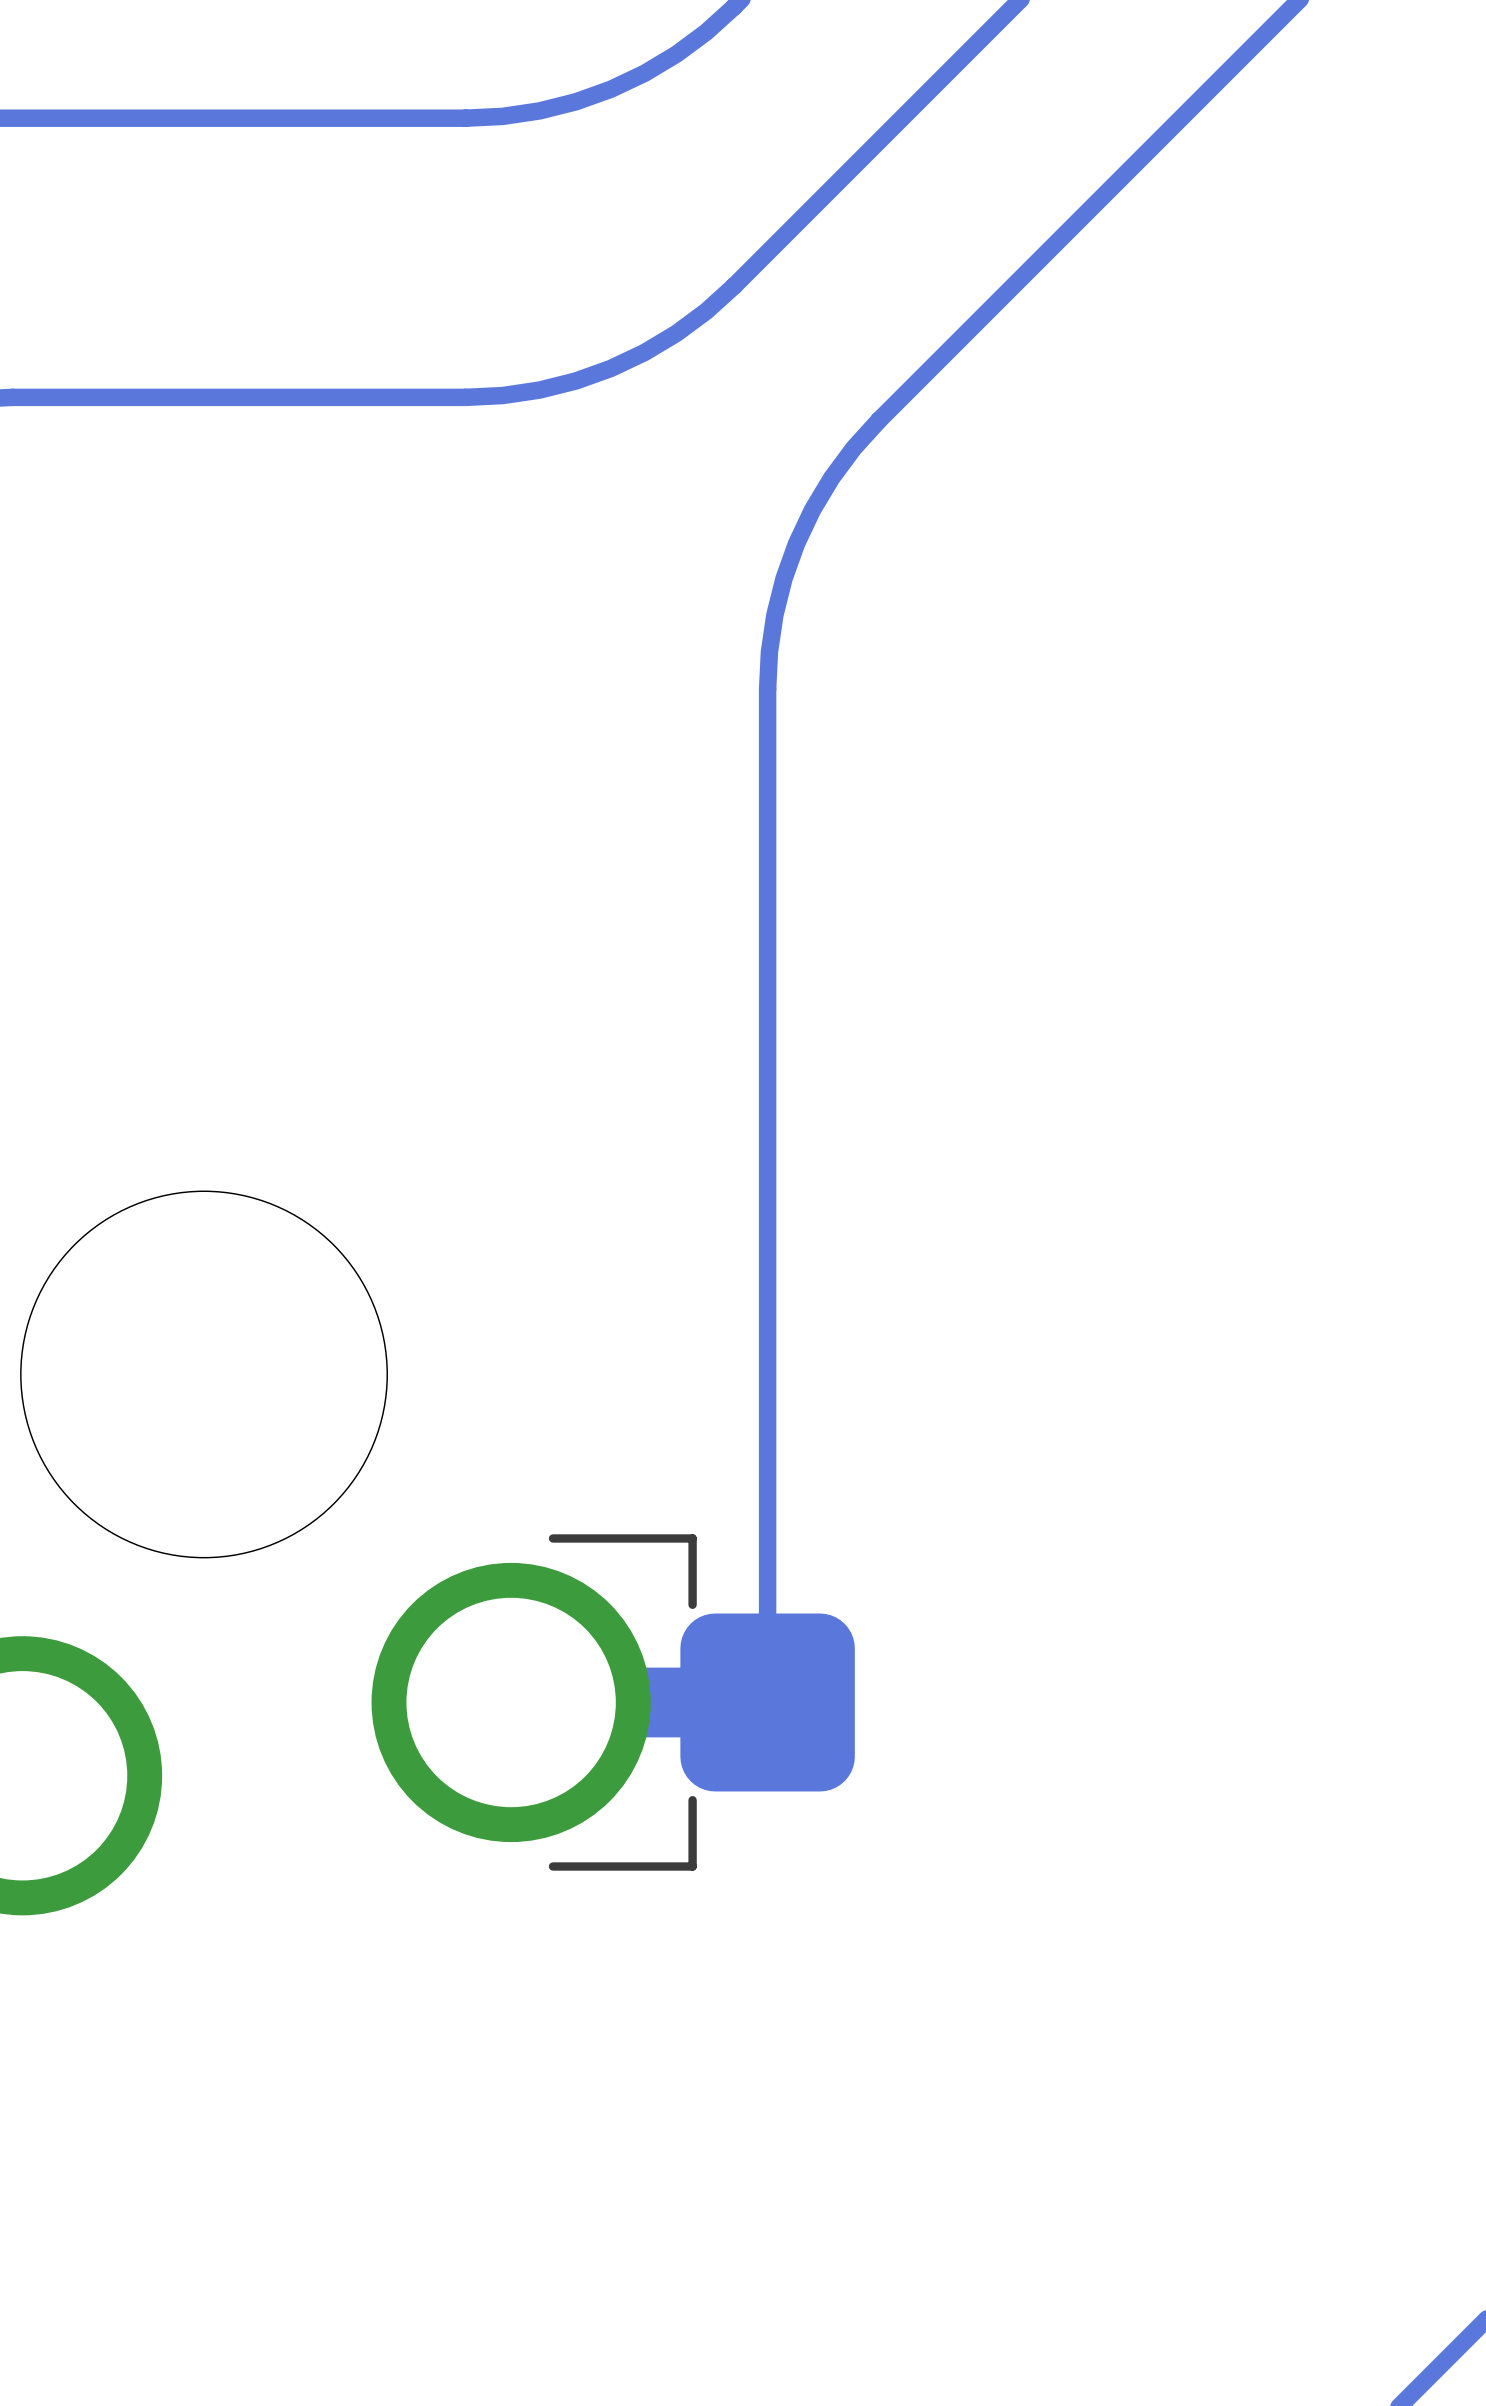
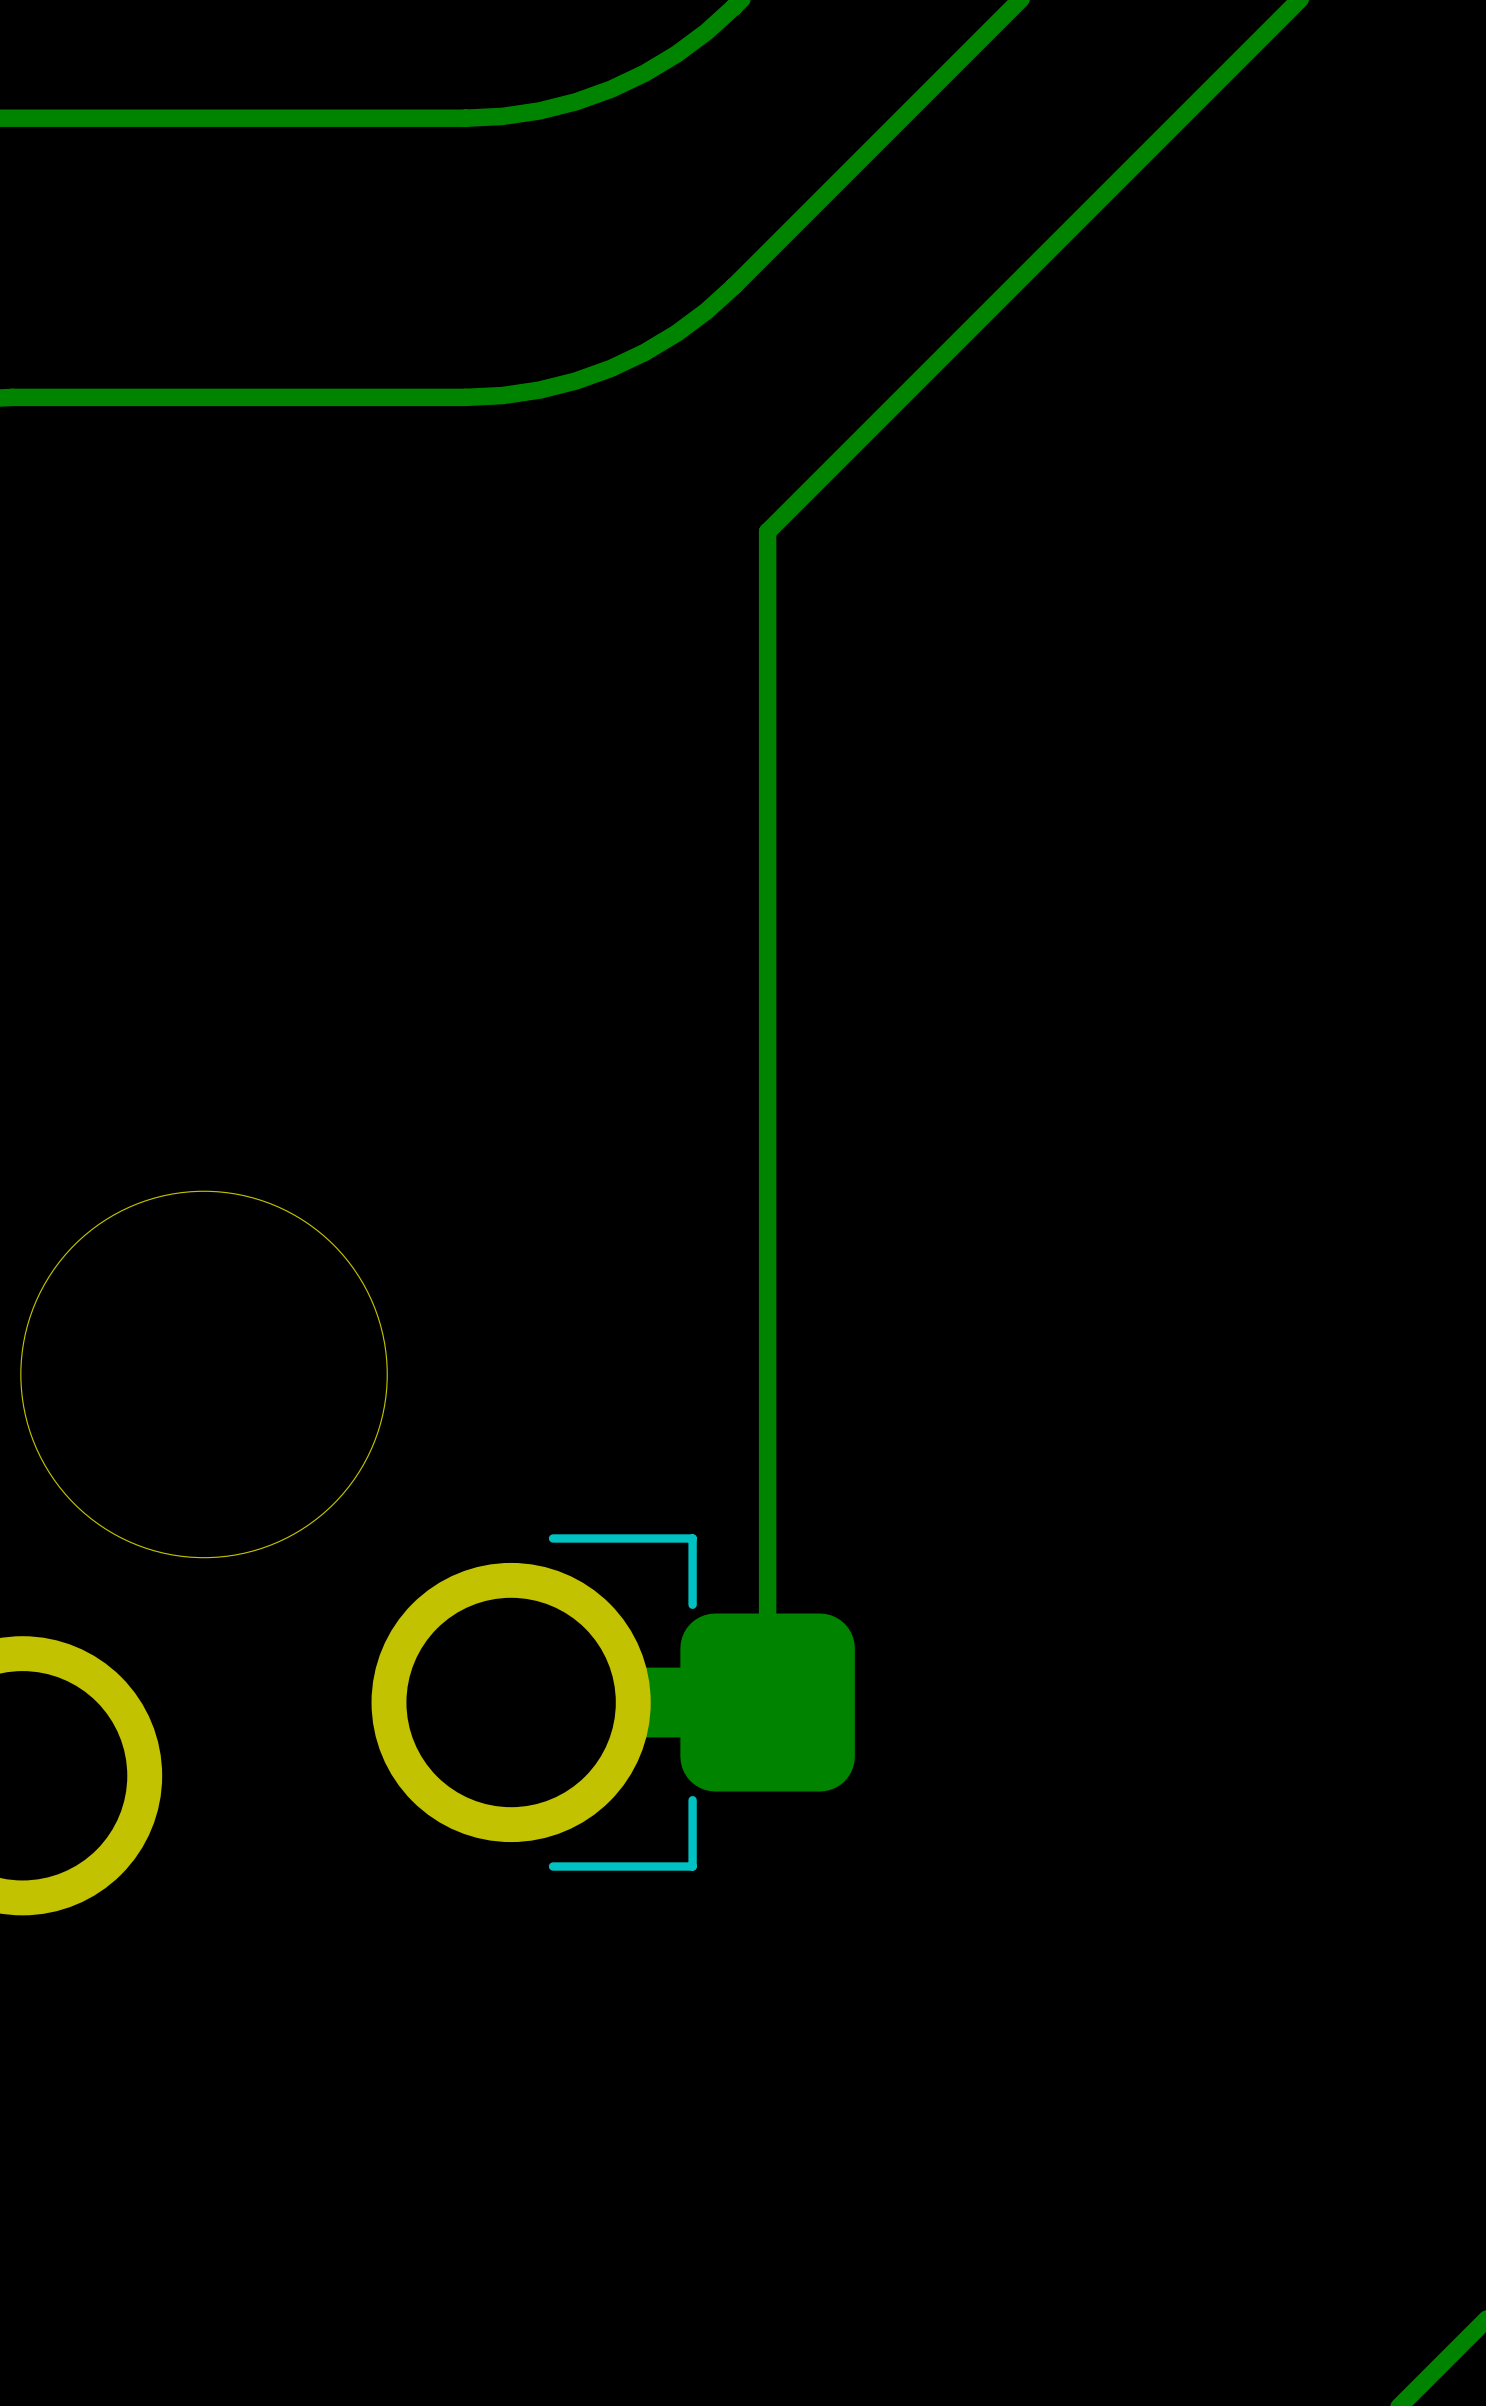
track: (878, 420) (853, 448) (831, 478) (812, 510) (796, 543) (783, 578) (774, 614) (769, 651) (767, 689) -> (878, 420) (767, 531) (767, 689)

